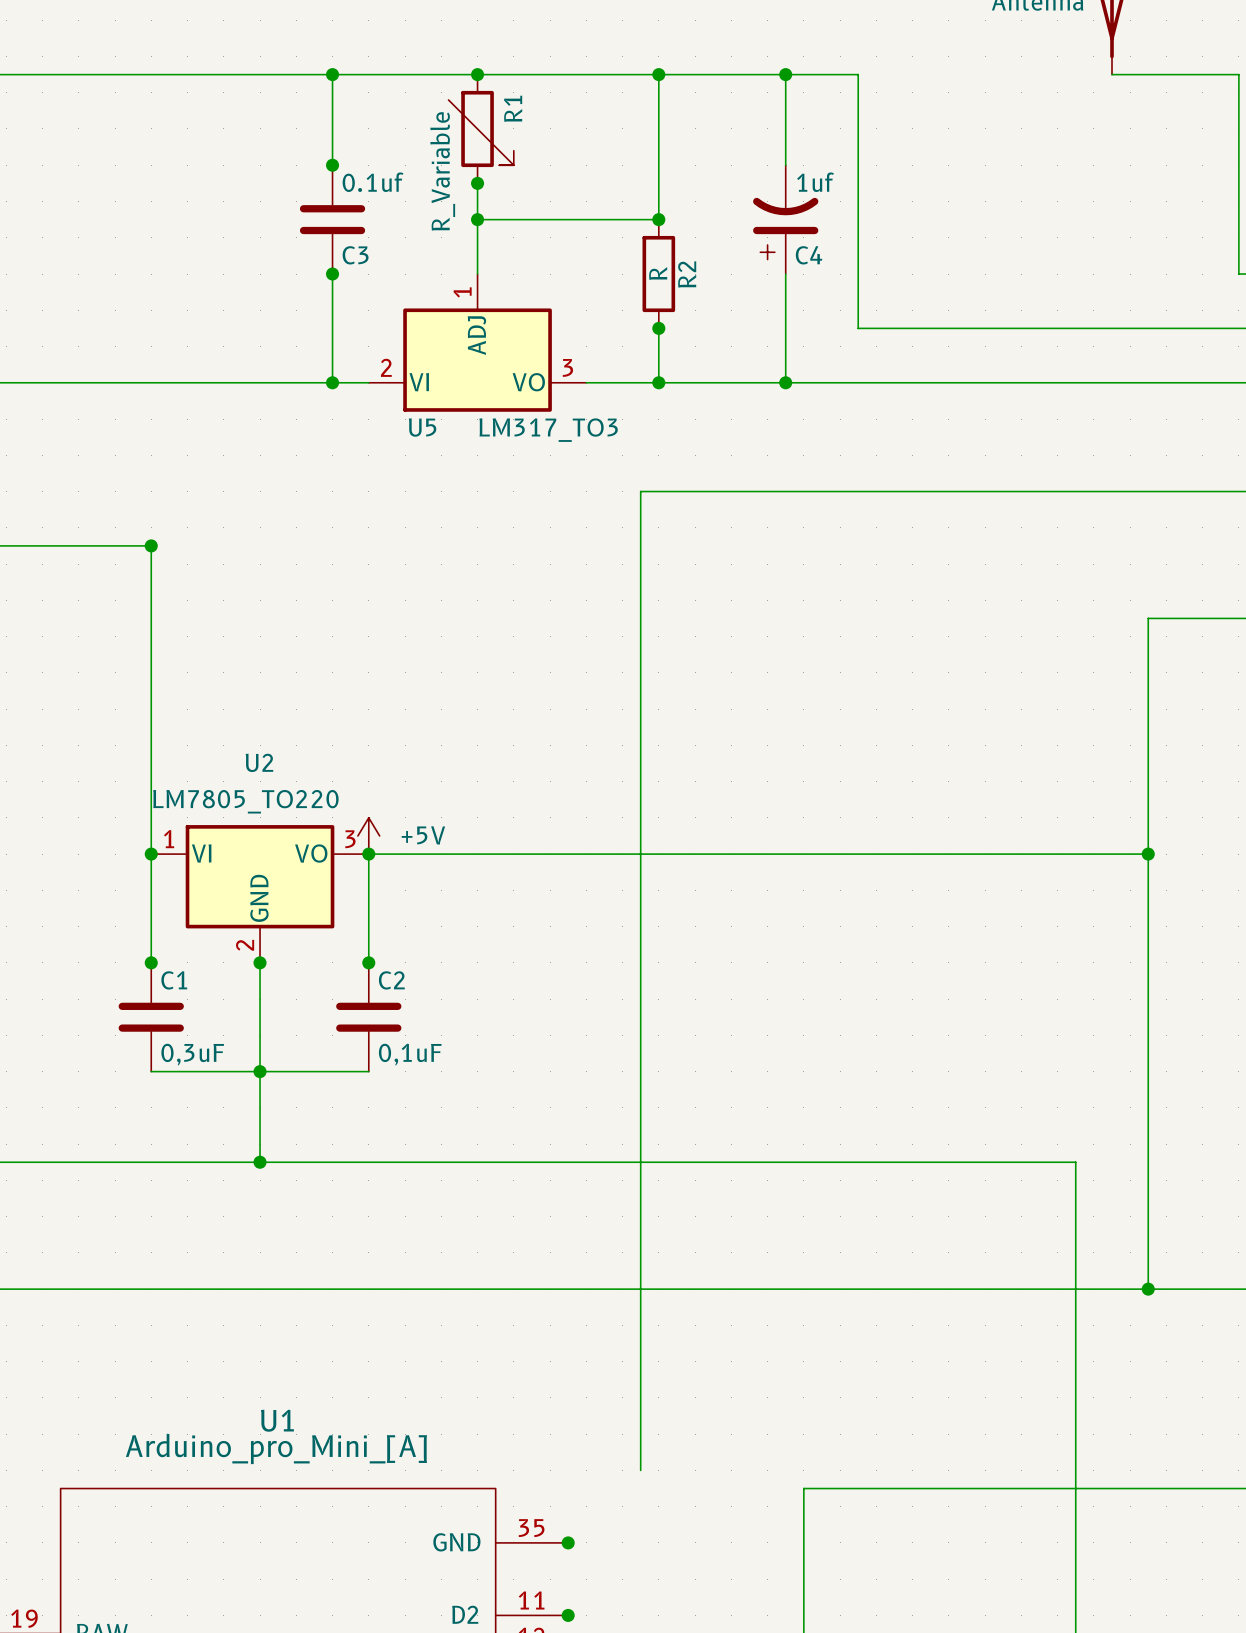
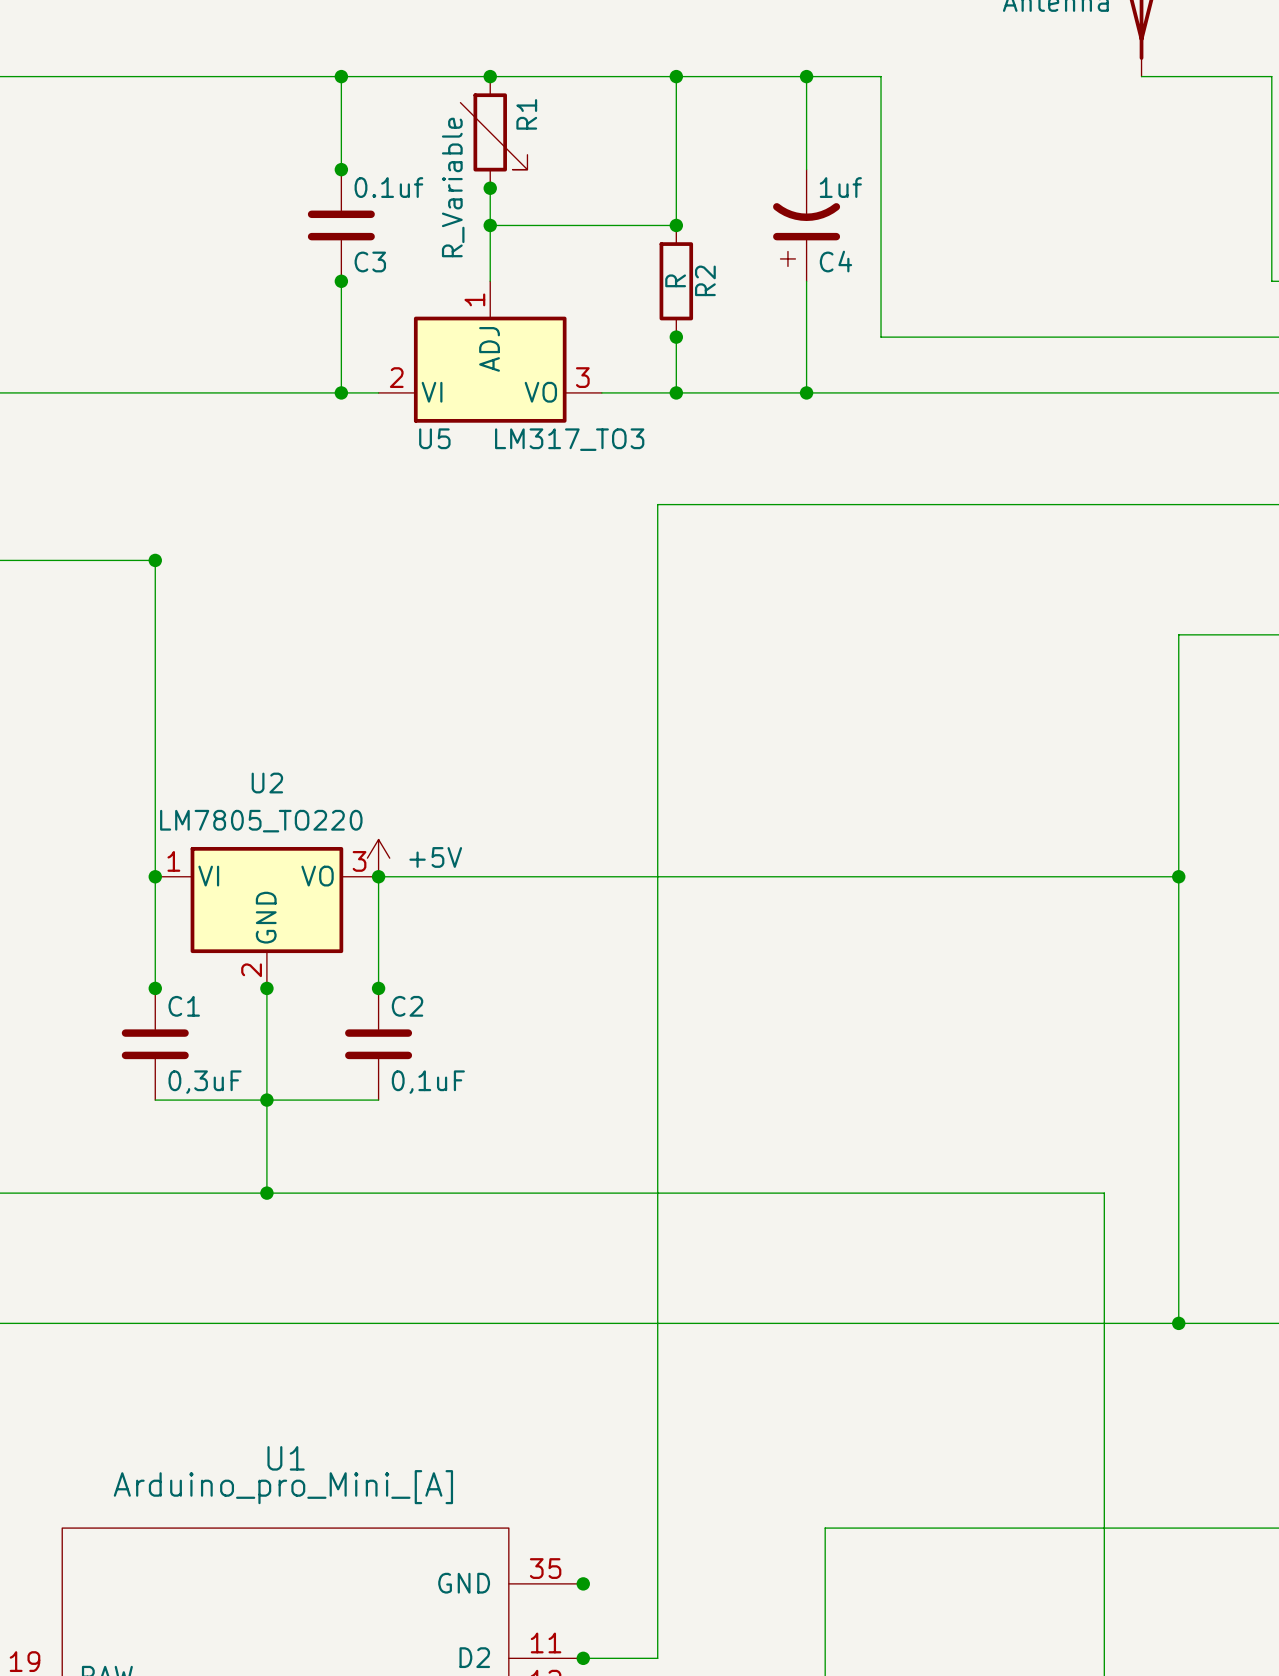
wire: none -> (657, 1509) (657, 1658) (583, 1658)

